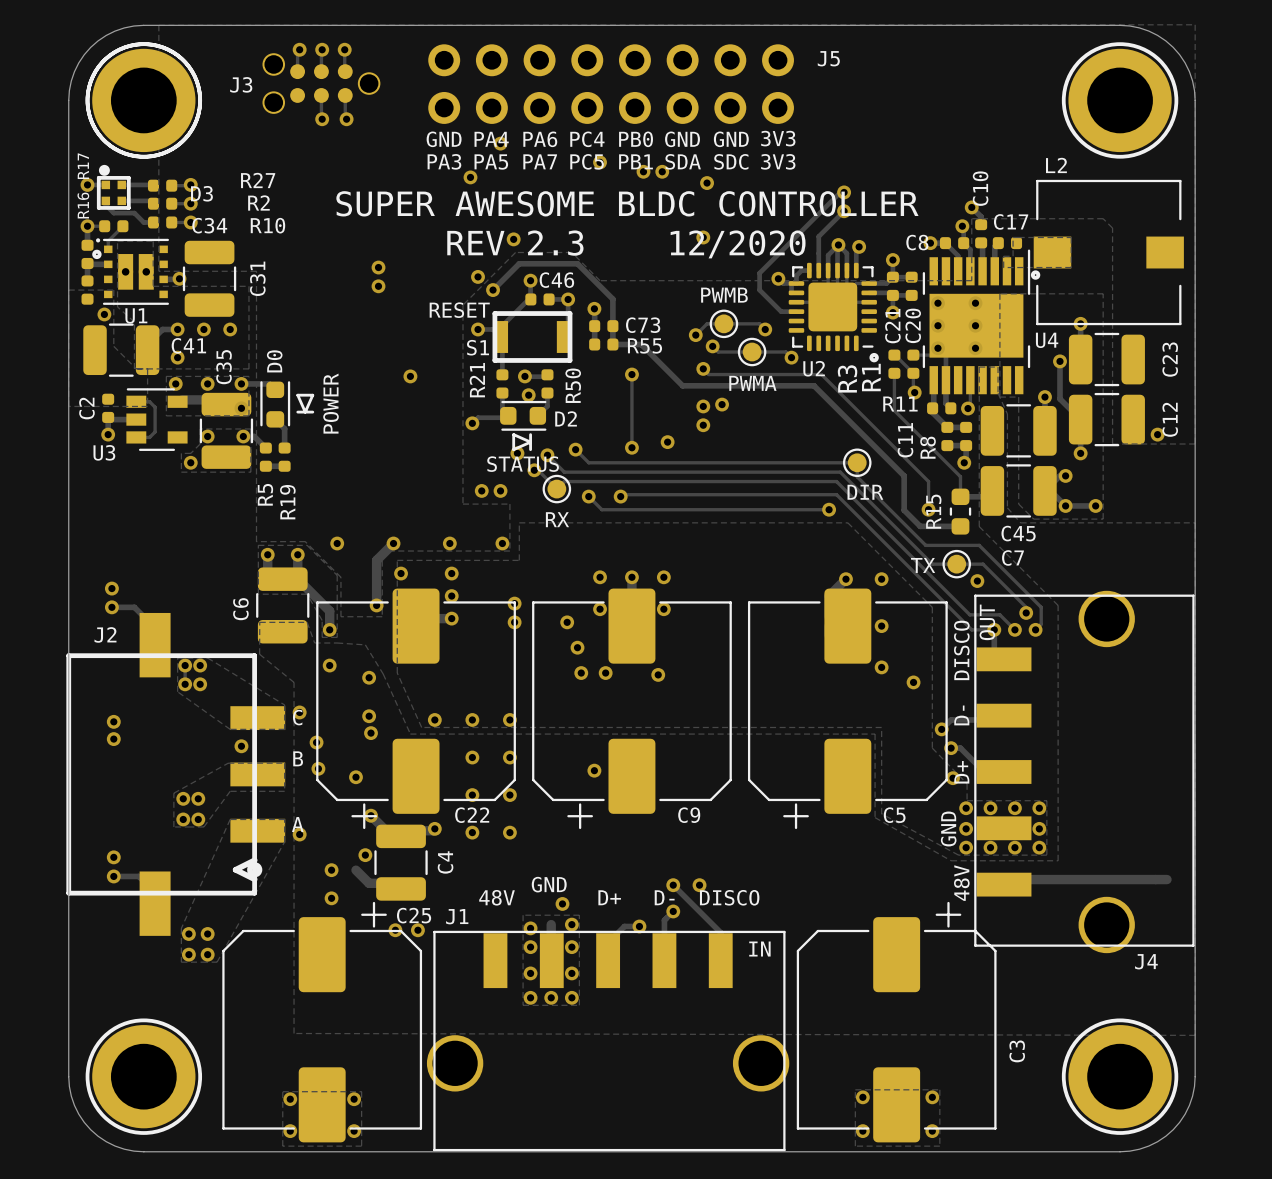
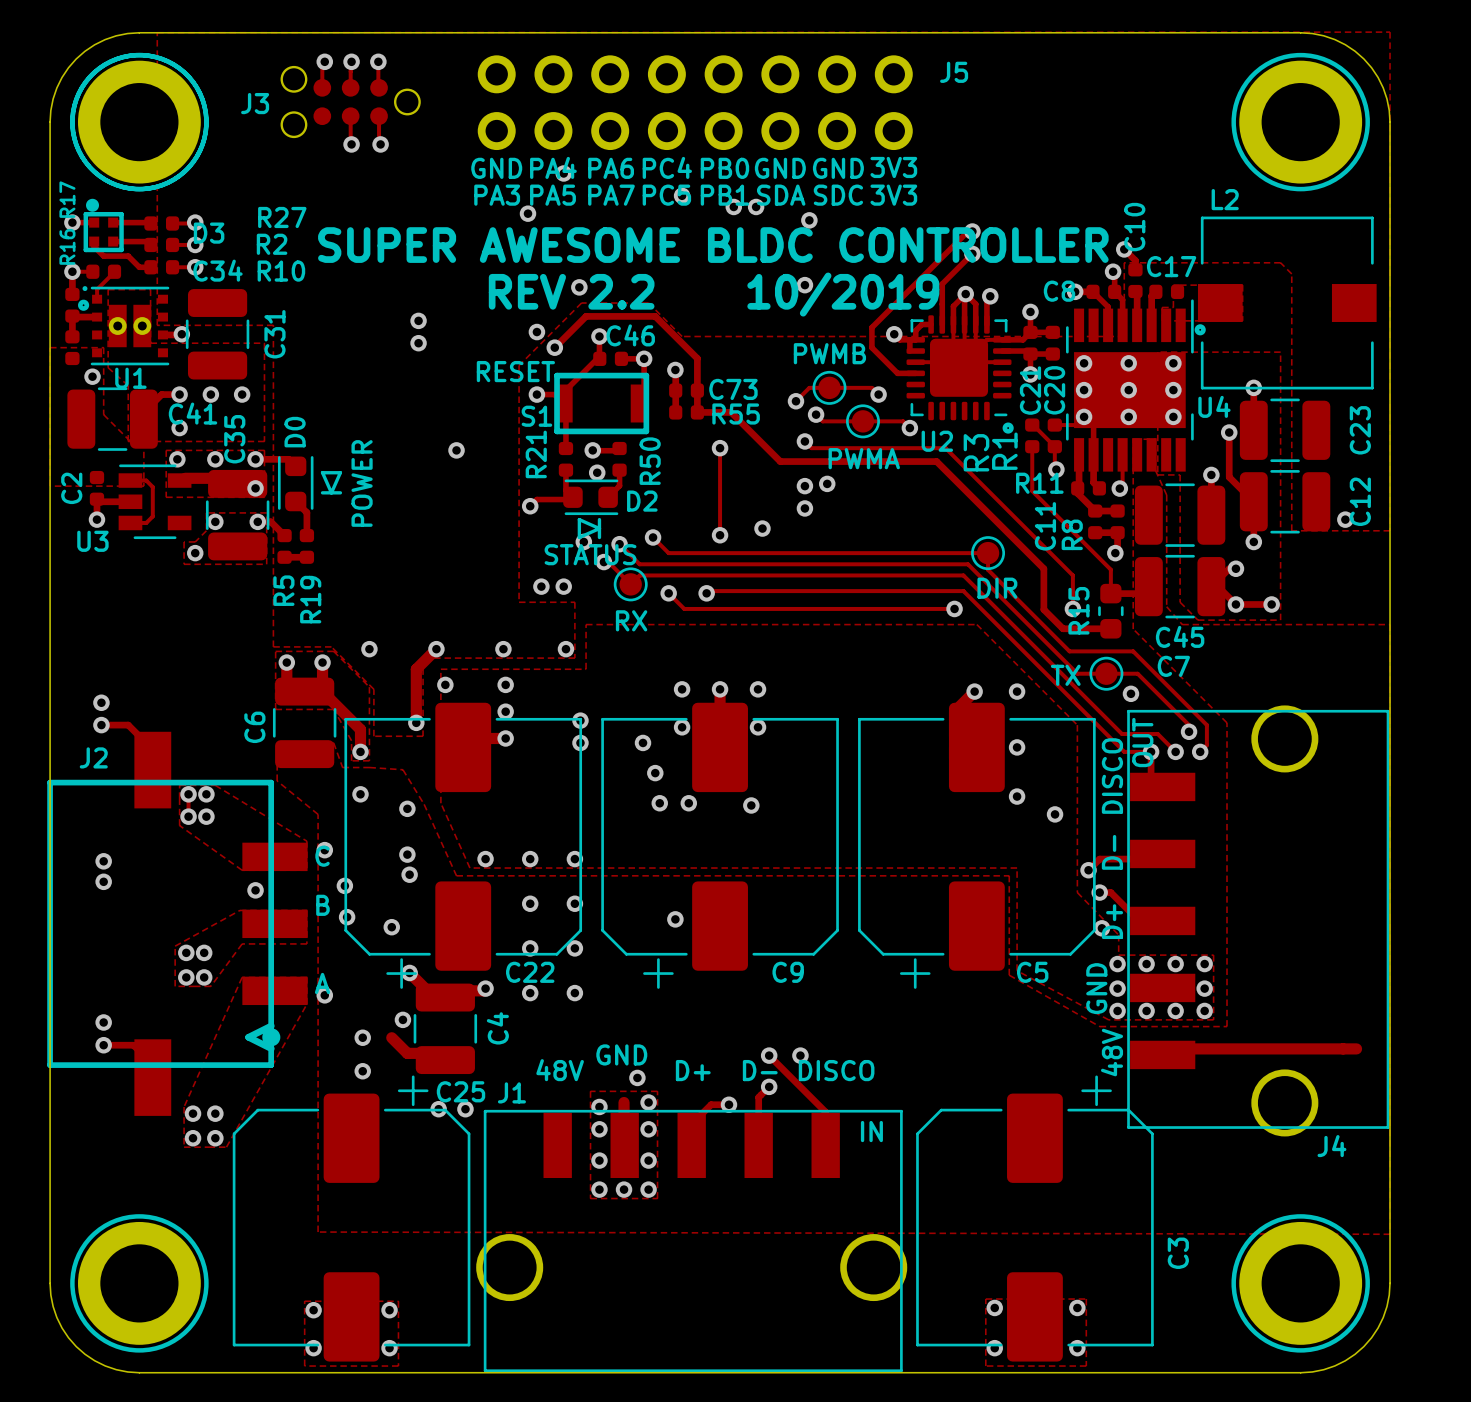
text: REV 2.3 12/2020 (626, 244) -> REV 2.2 10/2019 (714, 294)
via: none -> (1173, 363)
via: none -> (1173, 390)
via: none -> (1173, 416)

